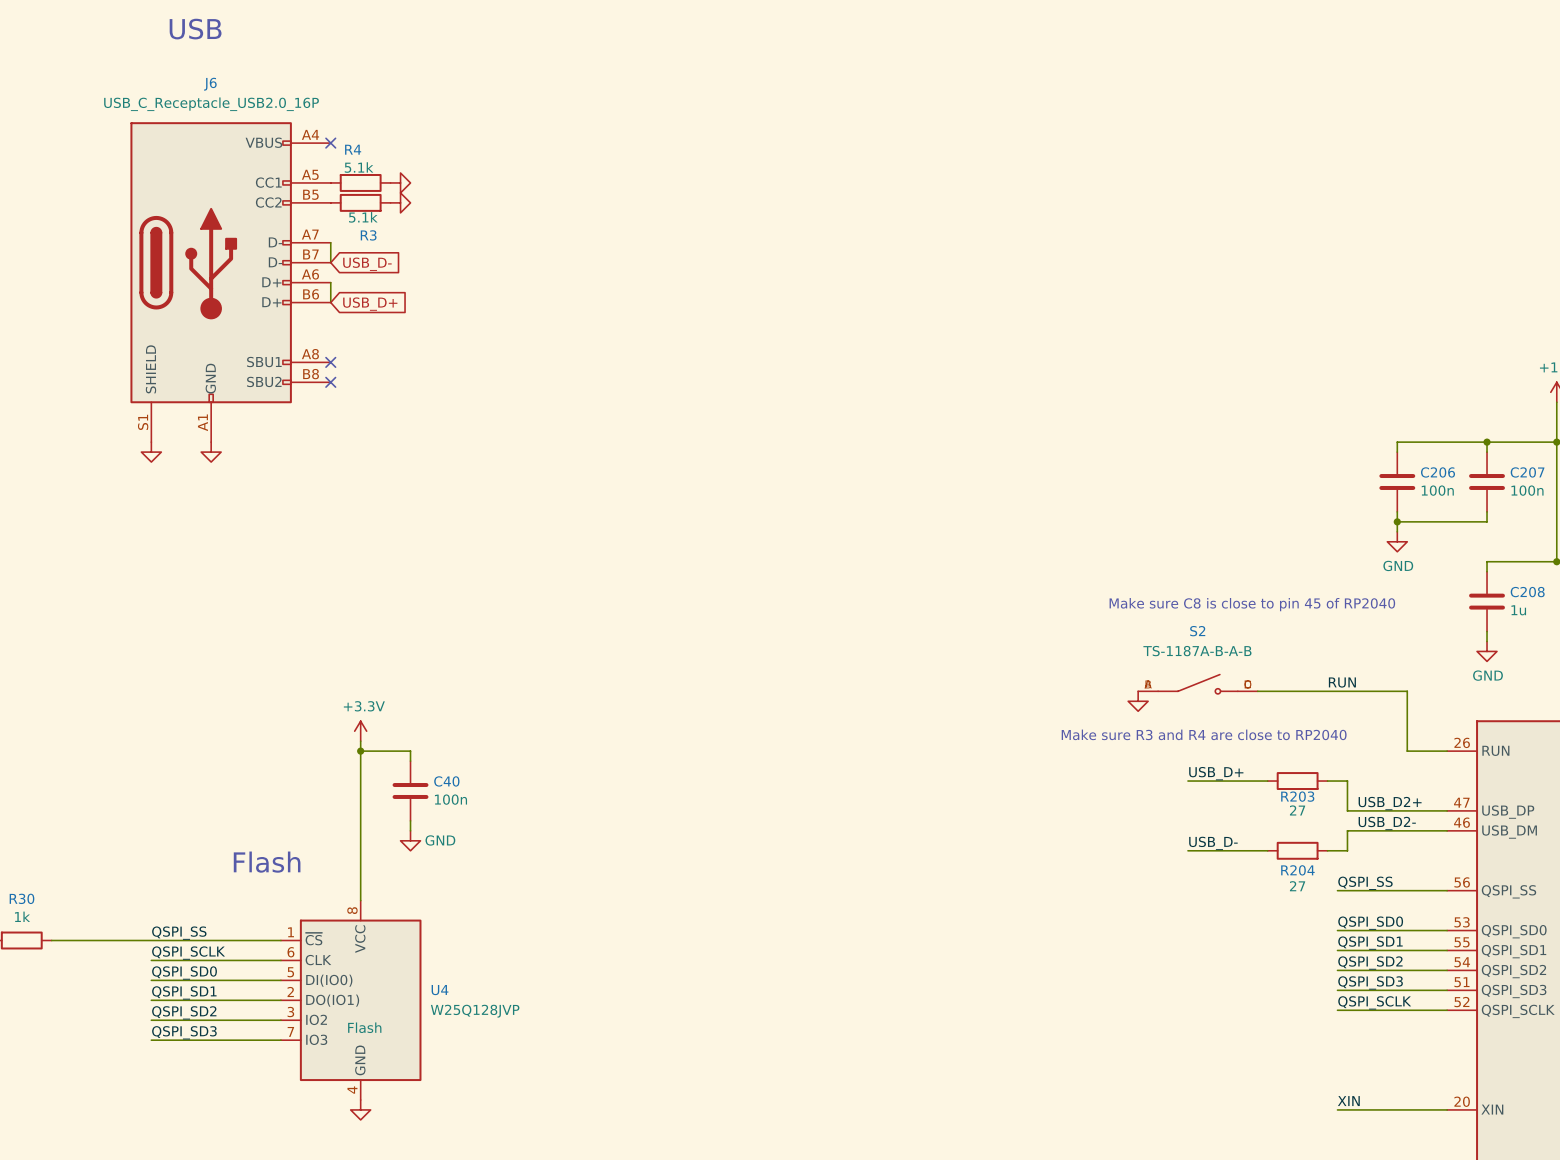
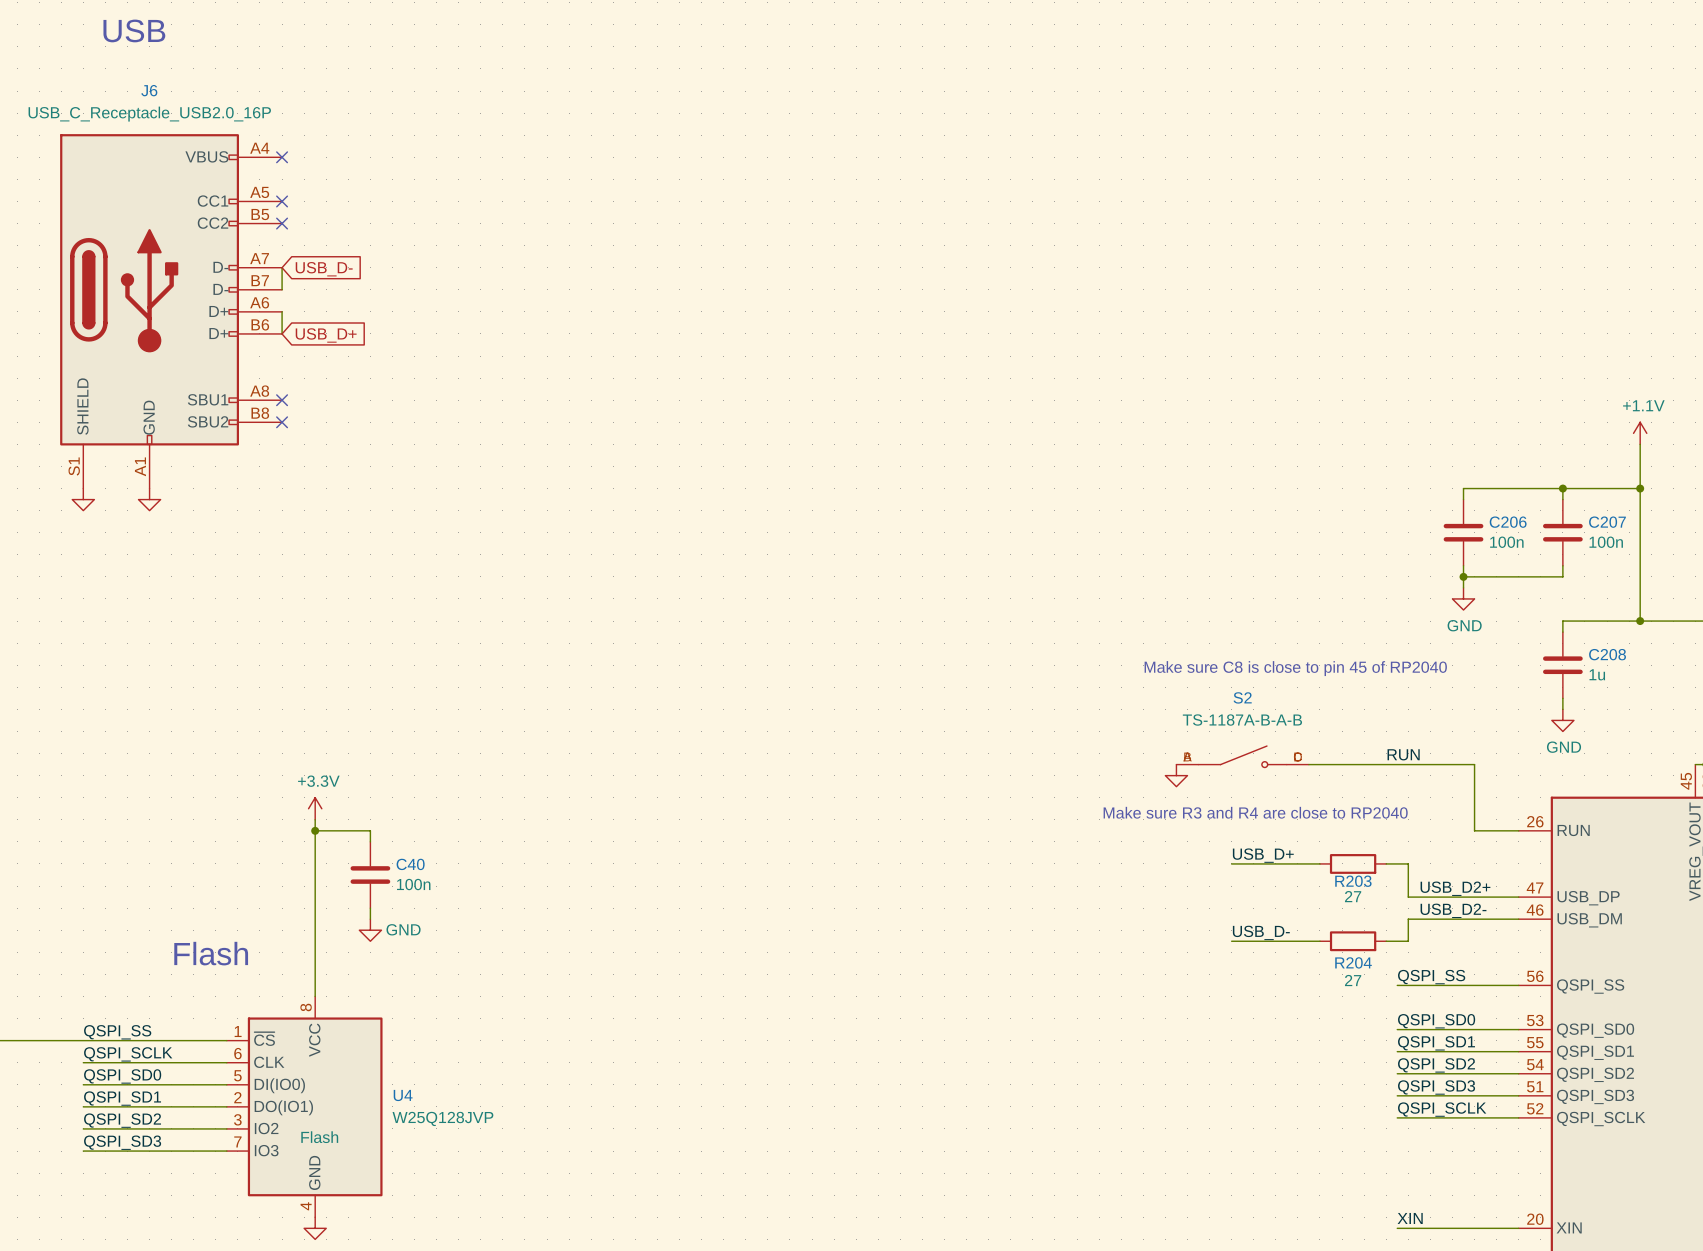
no-connect mark: none -> (282, 201)
R4: 5.1k (360, 182) -> none
power symbol: (400, 182) -> none
no-connect mark: none -> (282, 223)
R3: 5.1k (360, 202) -> none
power symbol: (400, 202) -> none
global label position: USB_D- (367, 264) -> USB_D- (324, 269)

